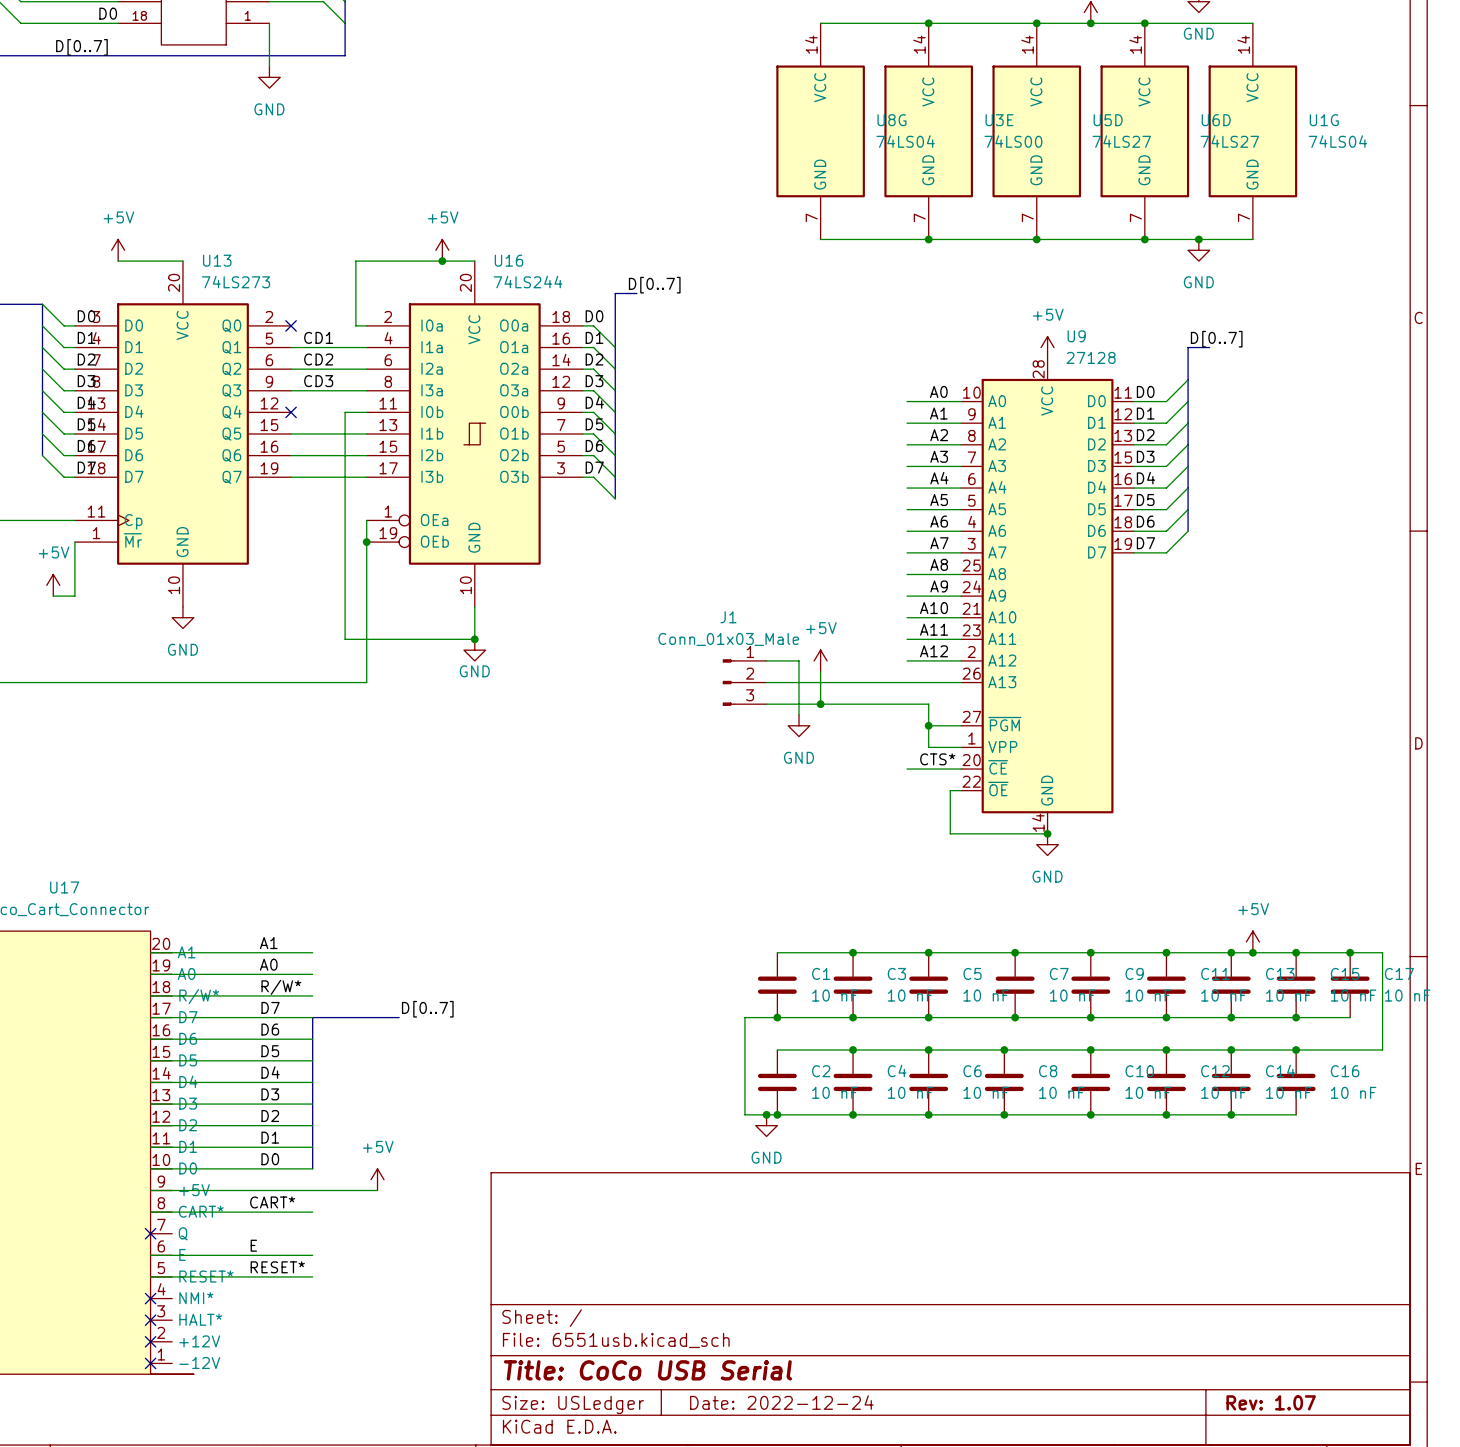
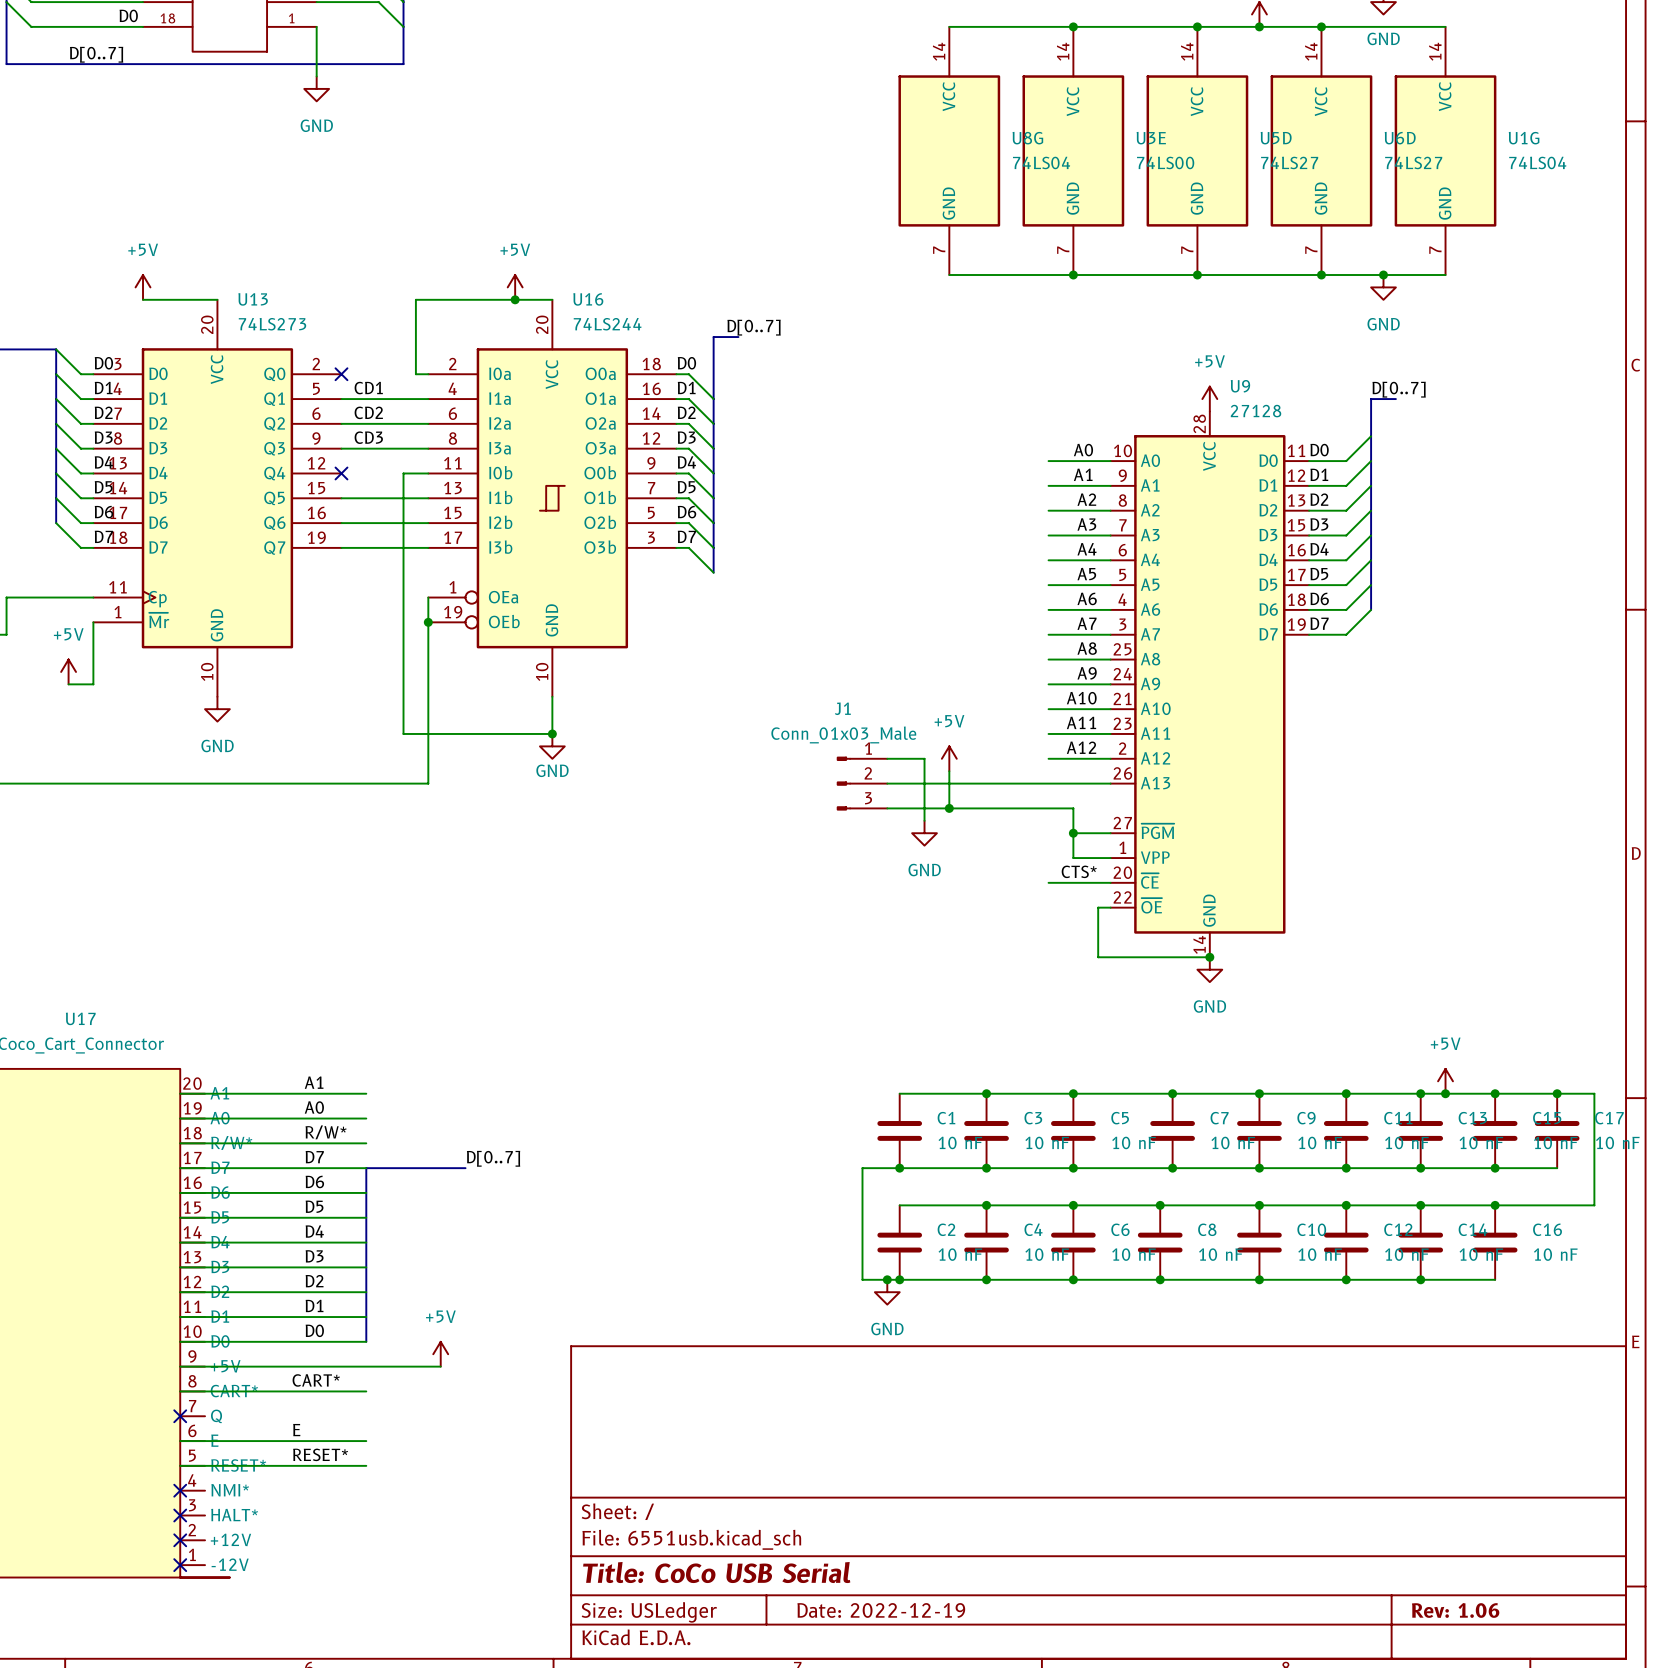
title block: Date: 2022-12-24 (781, 1402) -> Date: 2022-12-19 (881, 1610)
title block: Rev: 1.07 (1271, 1402) -> Rev: 1.06 (1455, 1610)

